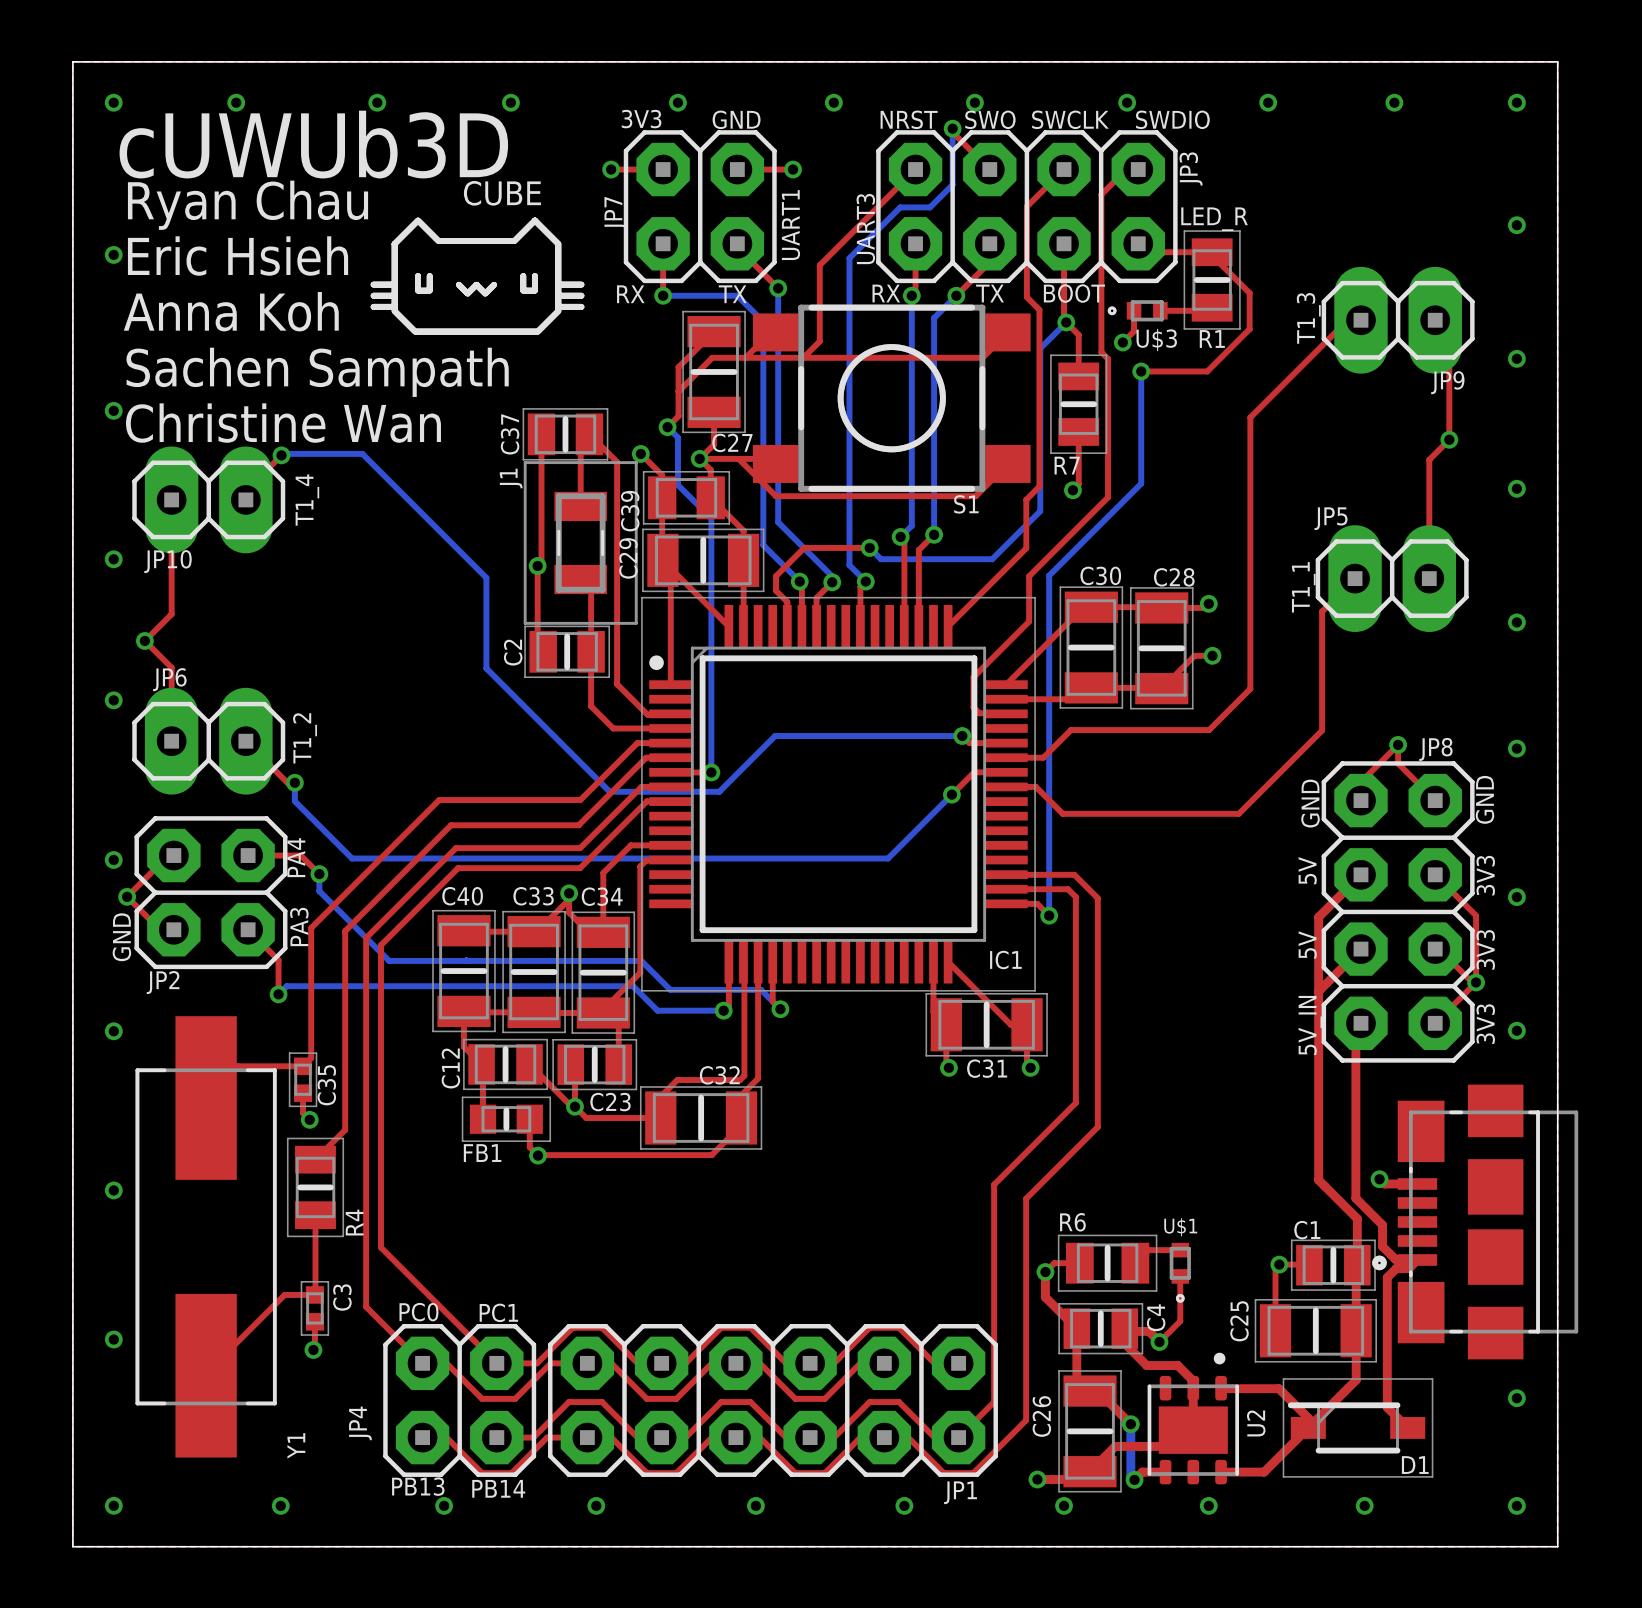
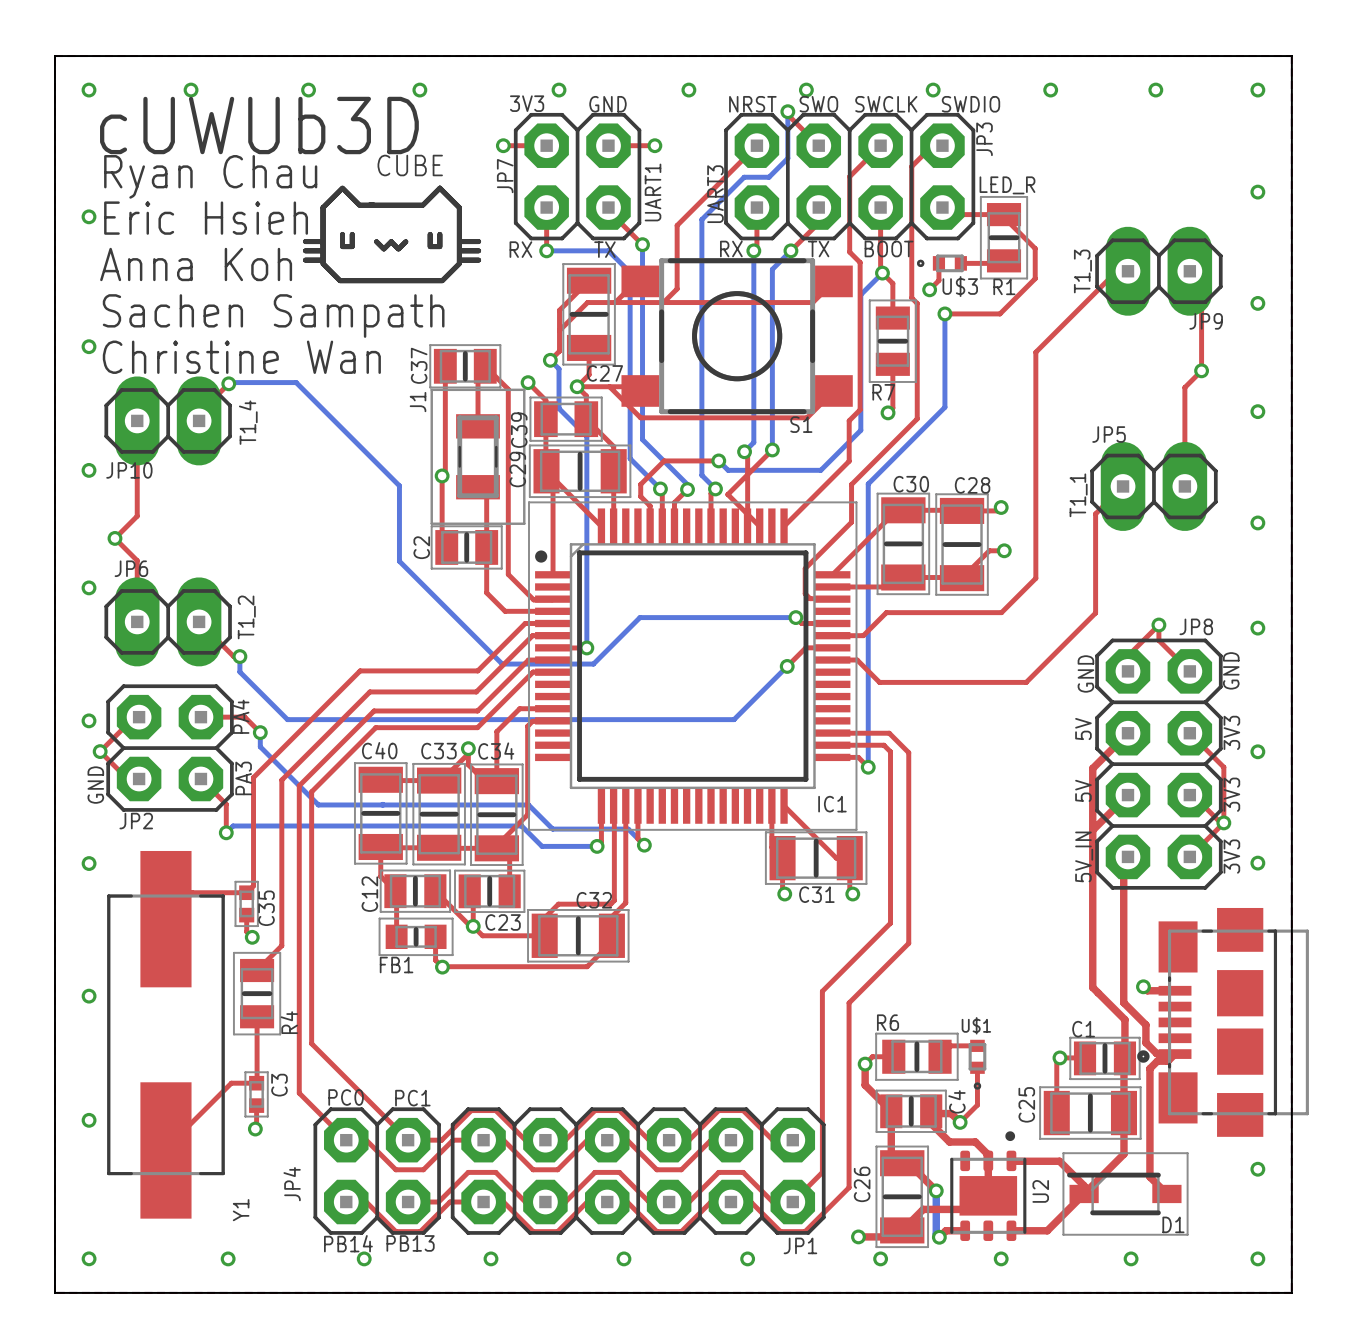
top track: (918, 550) (918, 626) -> (759, 462) (727, 494) (759, 526)
text: PB13 (418, 1486) -> PB14 (348, 1243)
text: PB14 (498, 1488) -> PB13 (410, 1243)

